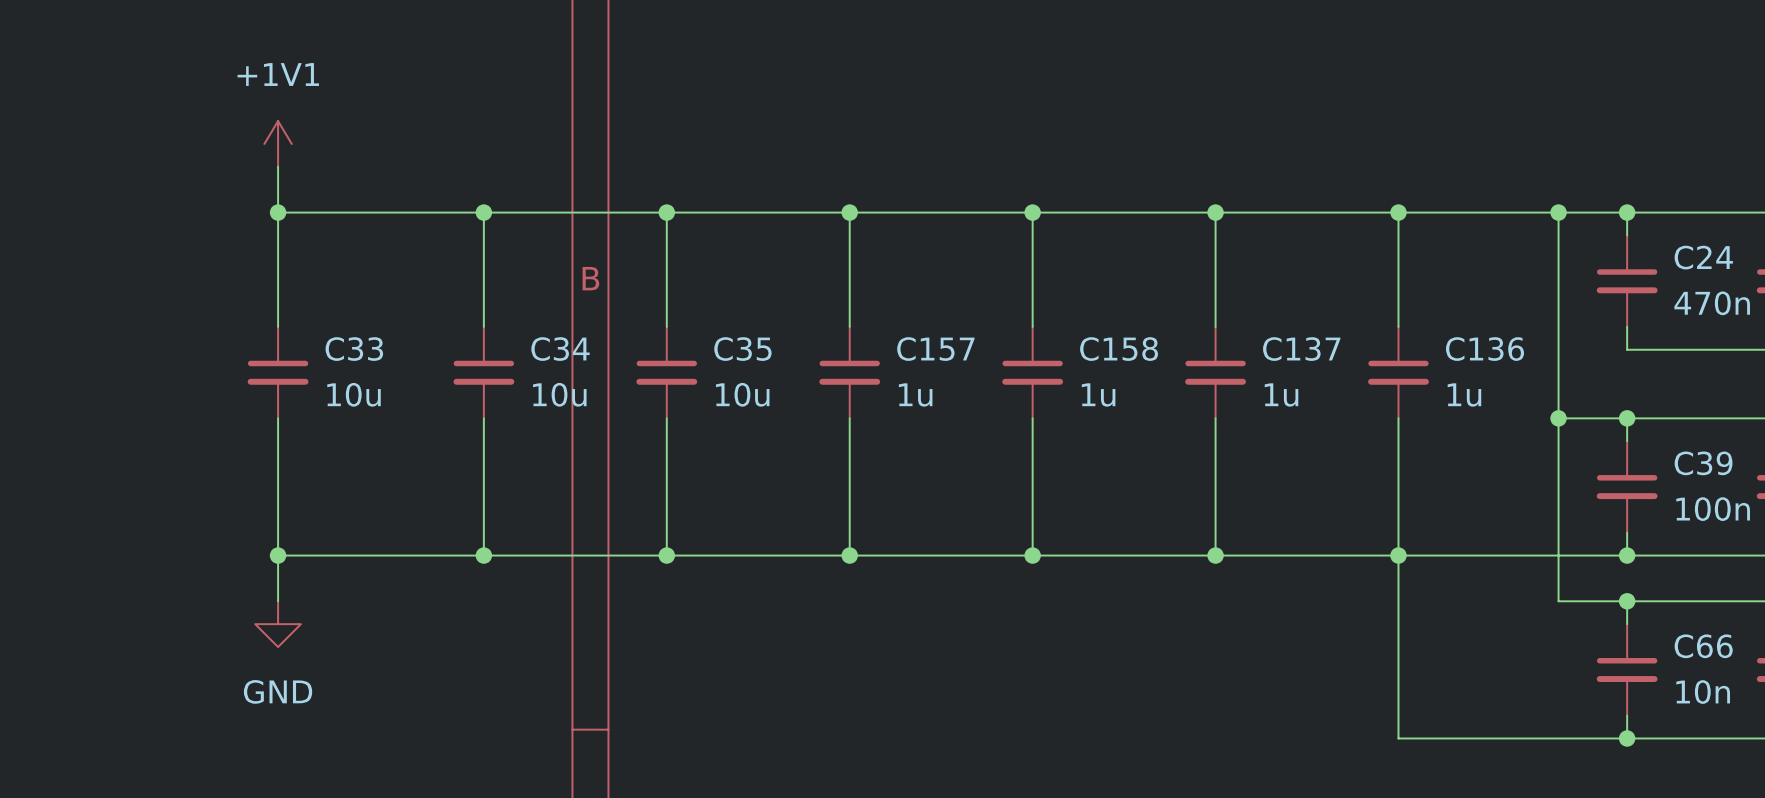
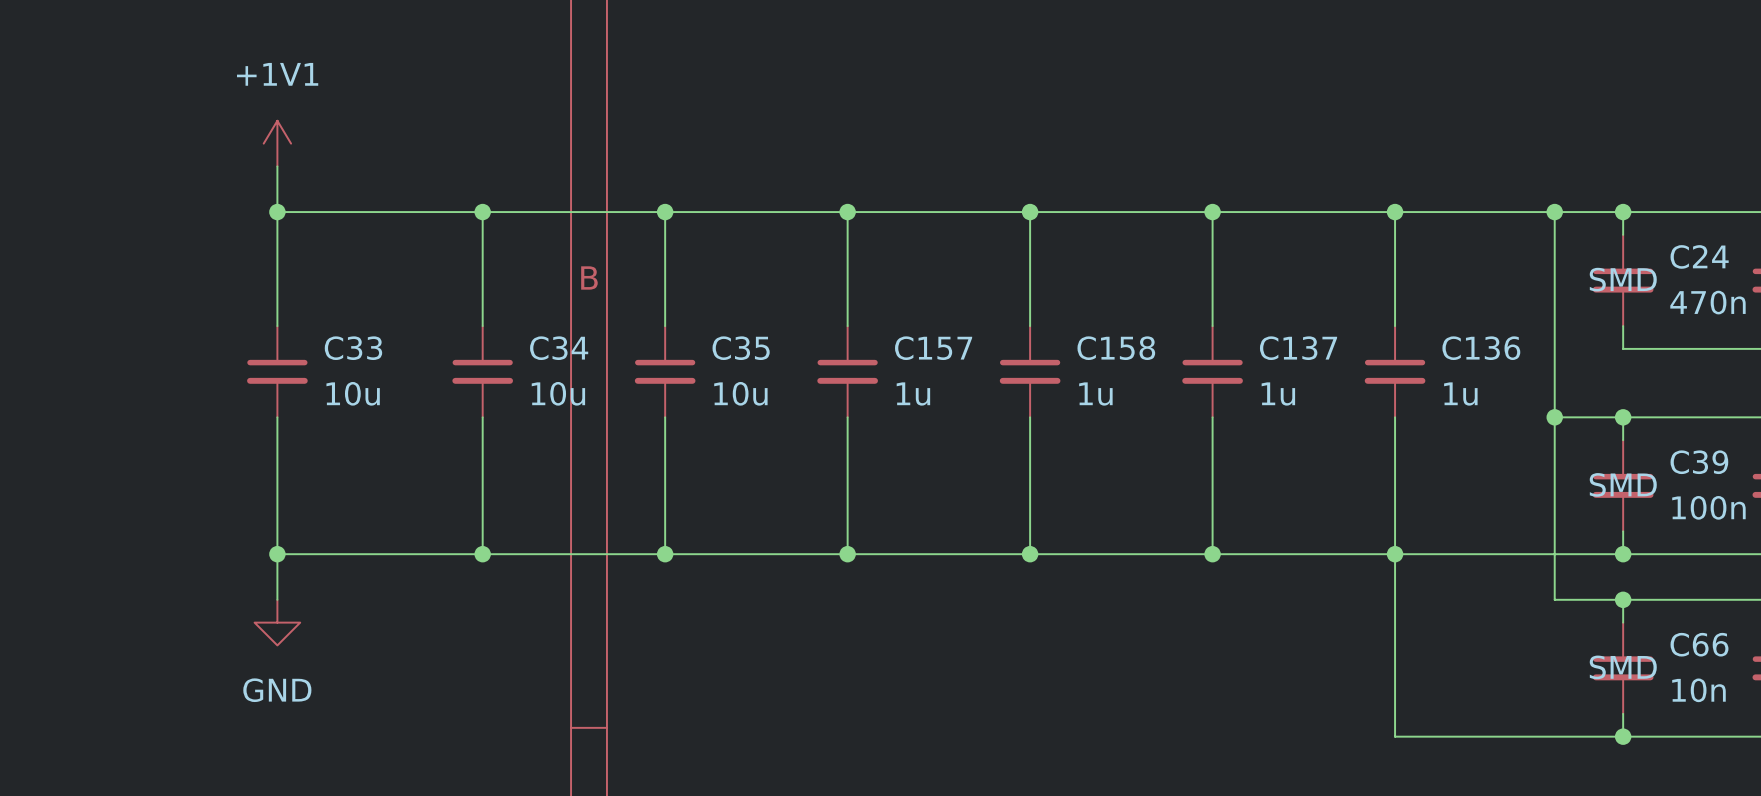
C24 text: none -> SMD (1623, 279)
C39 text: none -> SMD (1623, 484)
C66 text: none -> SMD (1623, 667)

